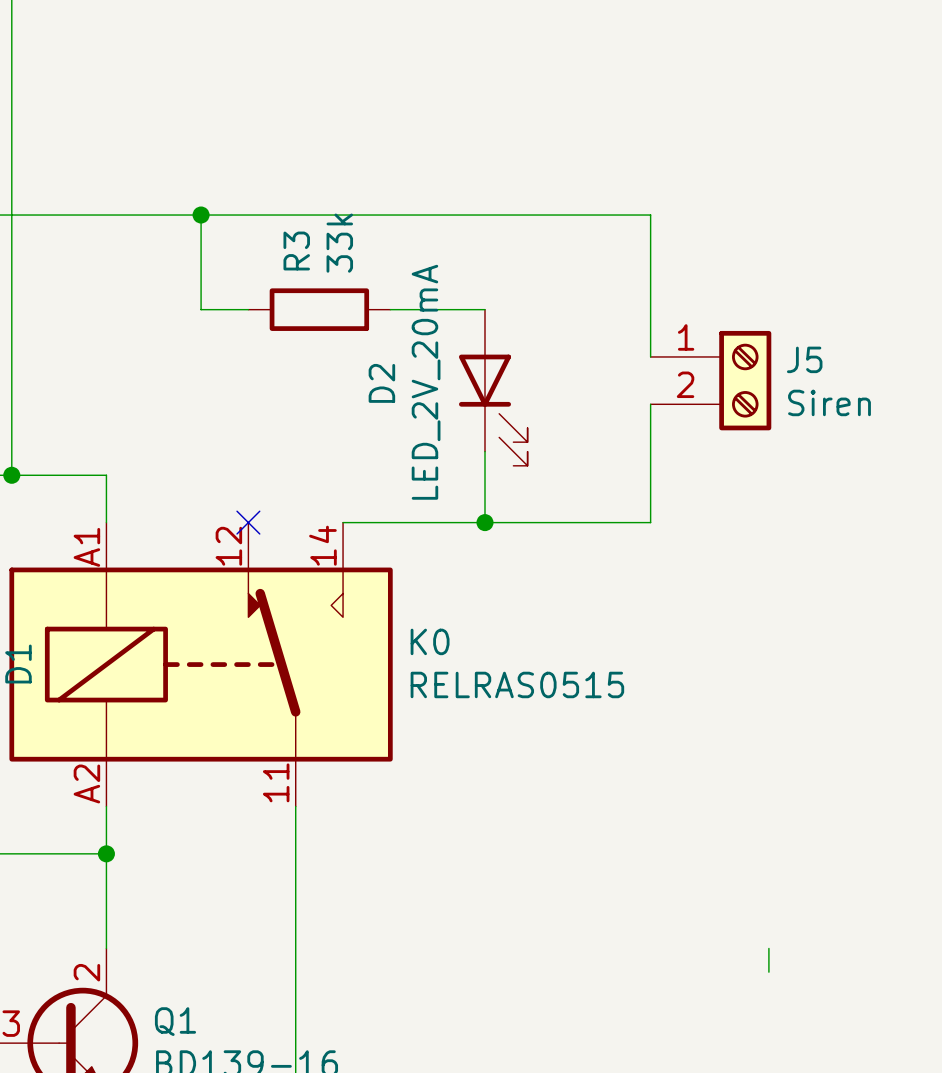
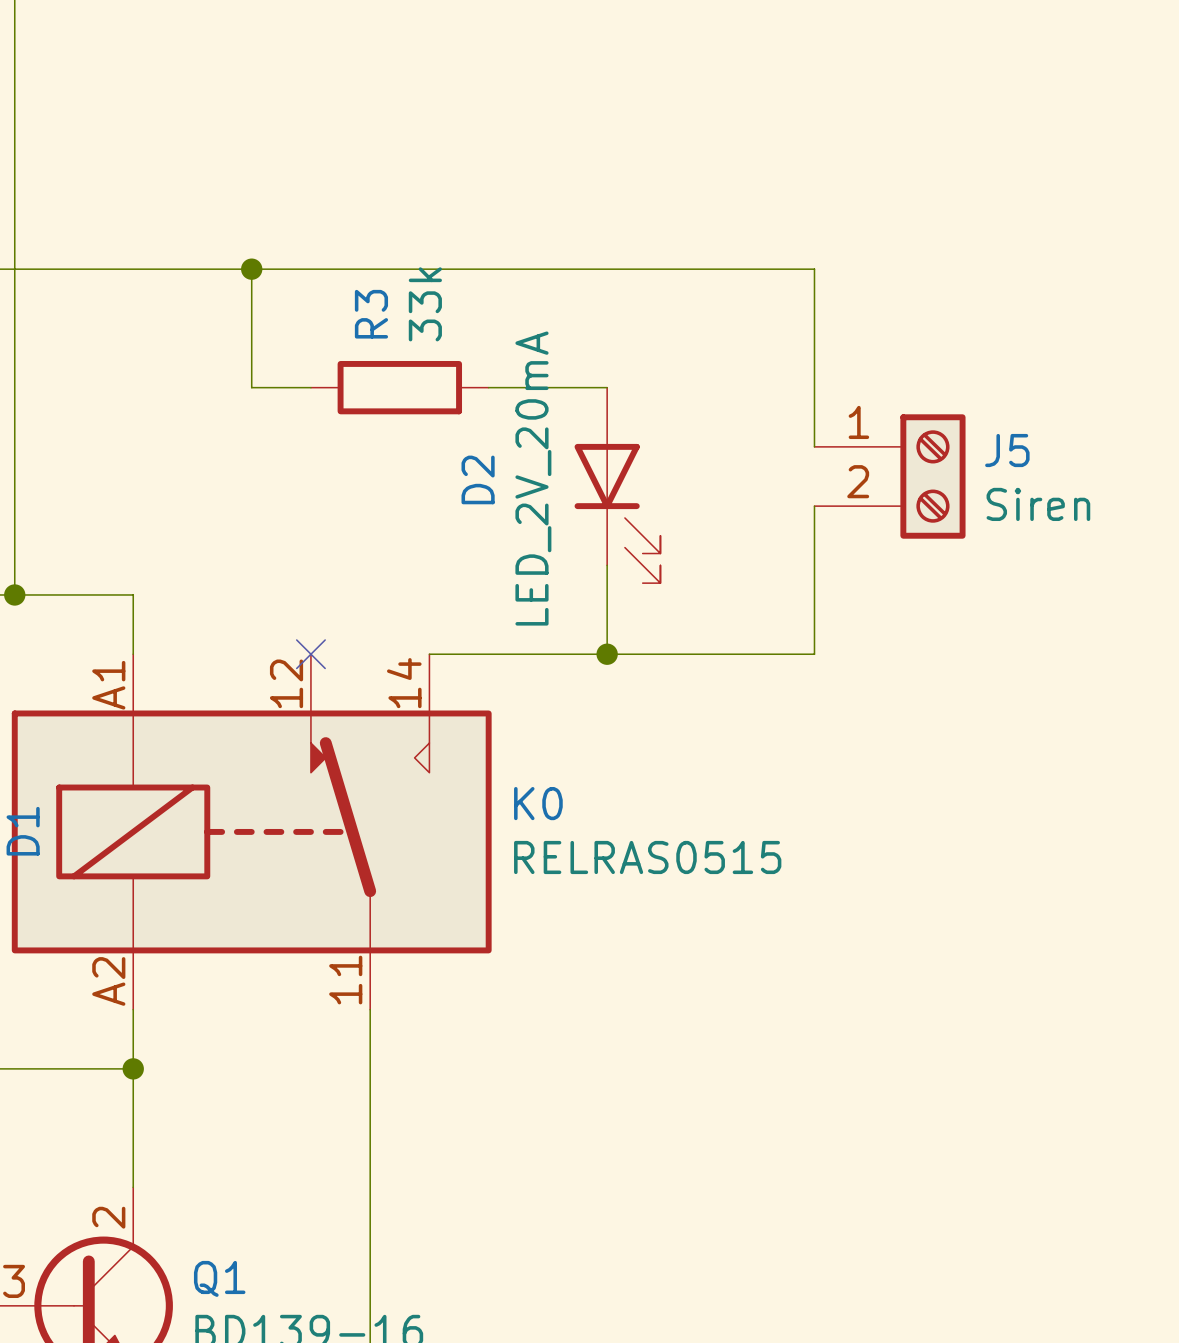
wire: (768, 948) (768, 972) -> none

